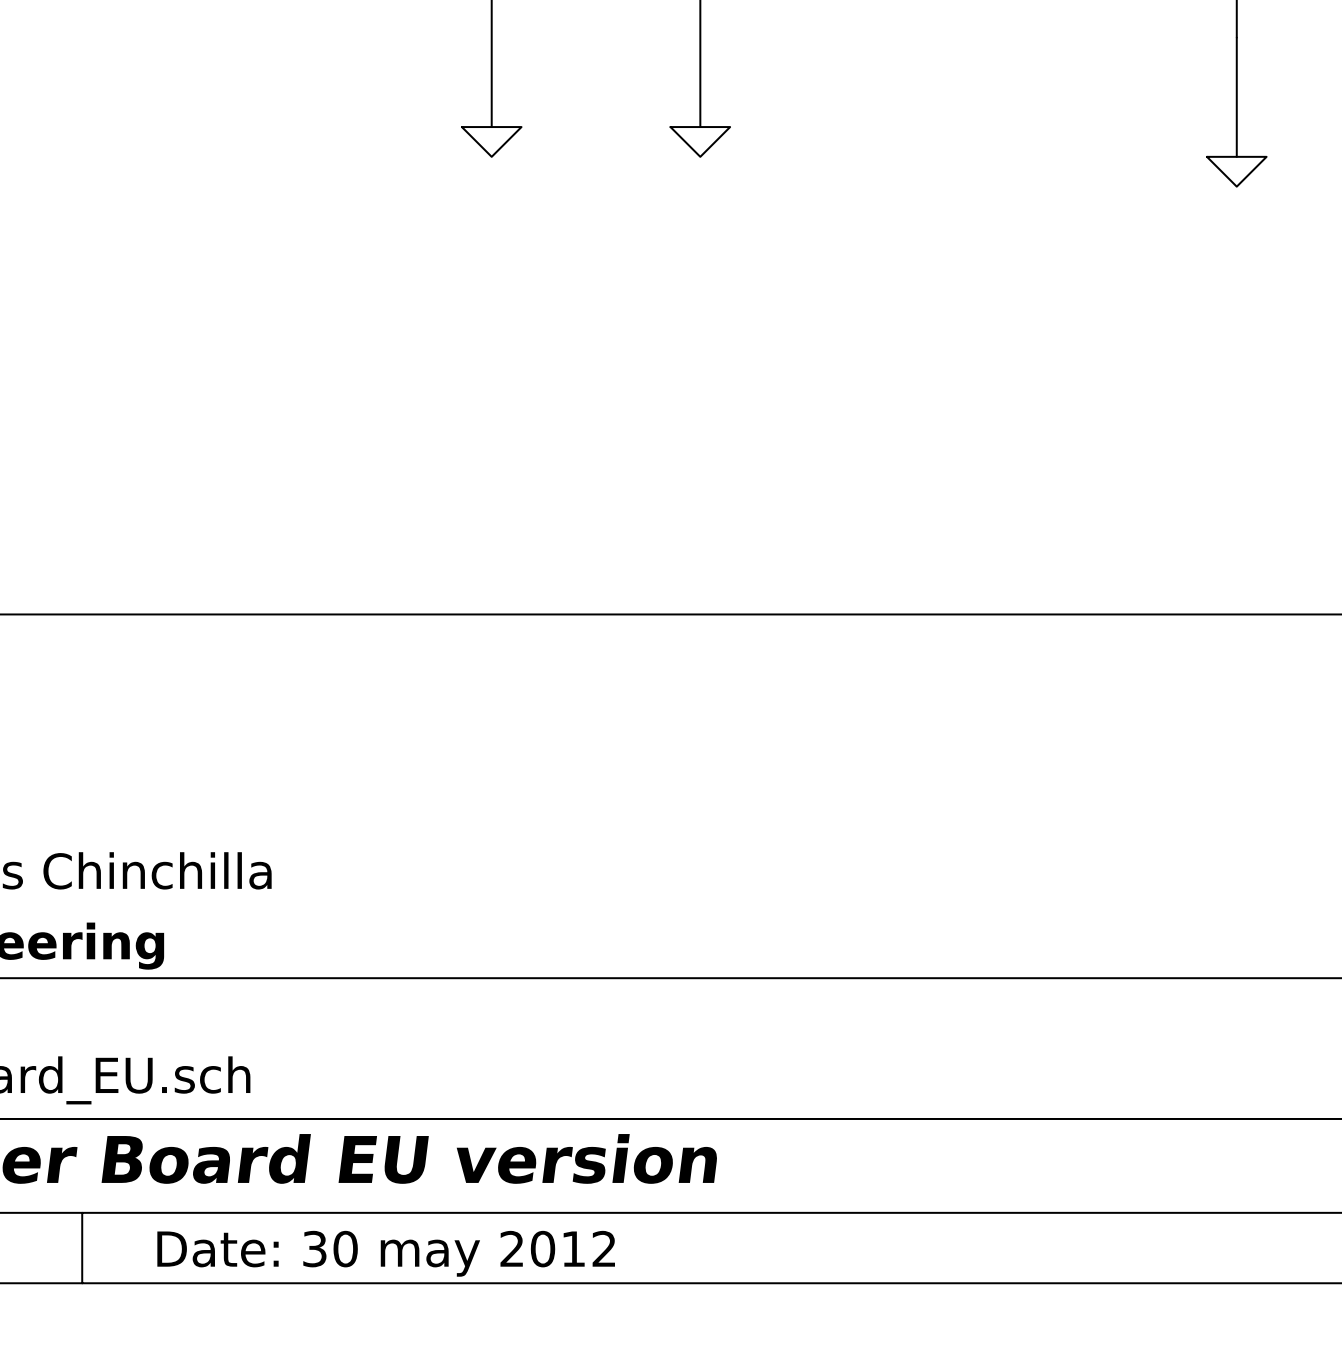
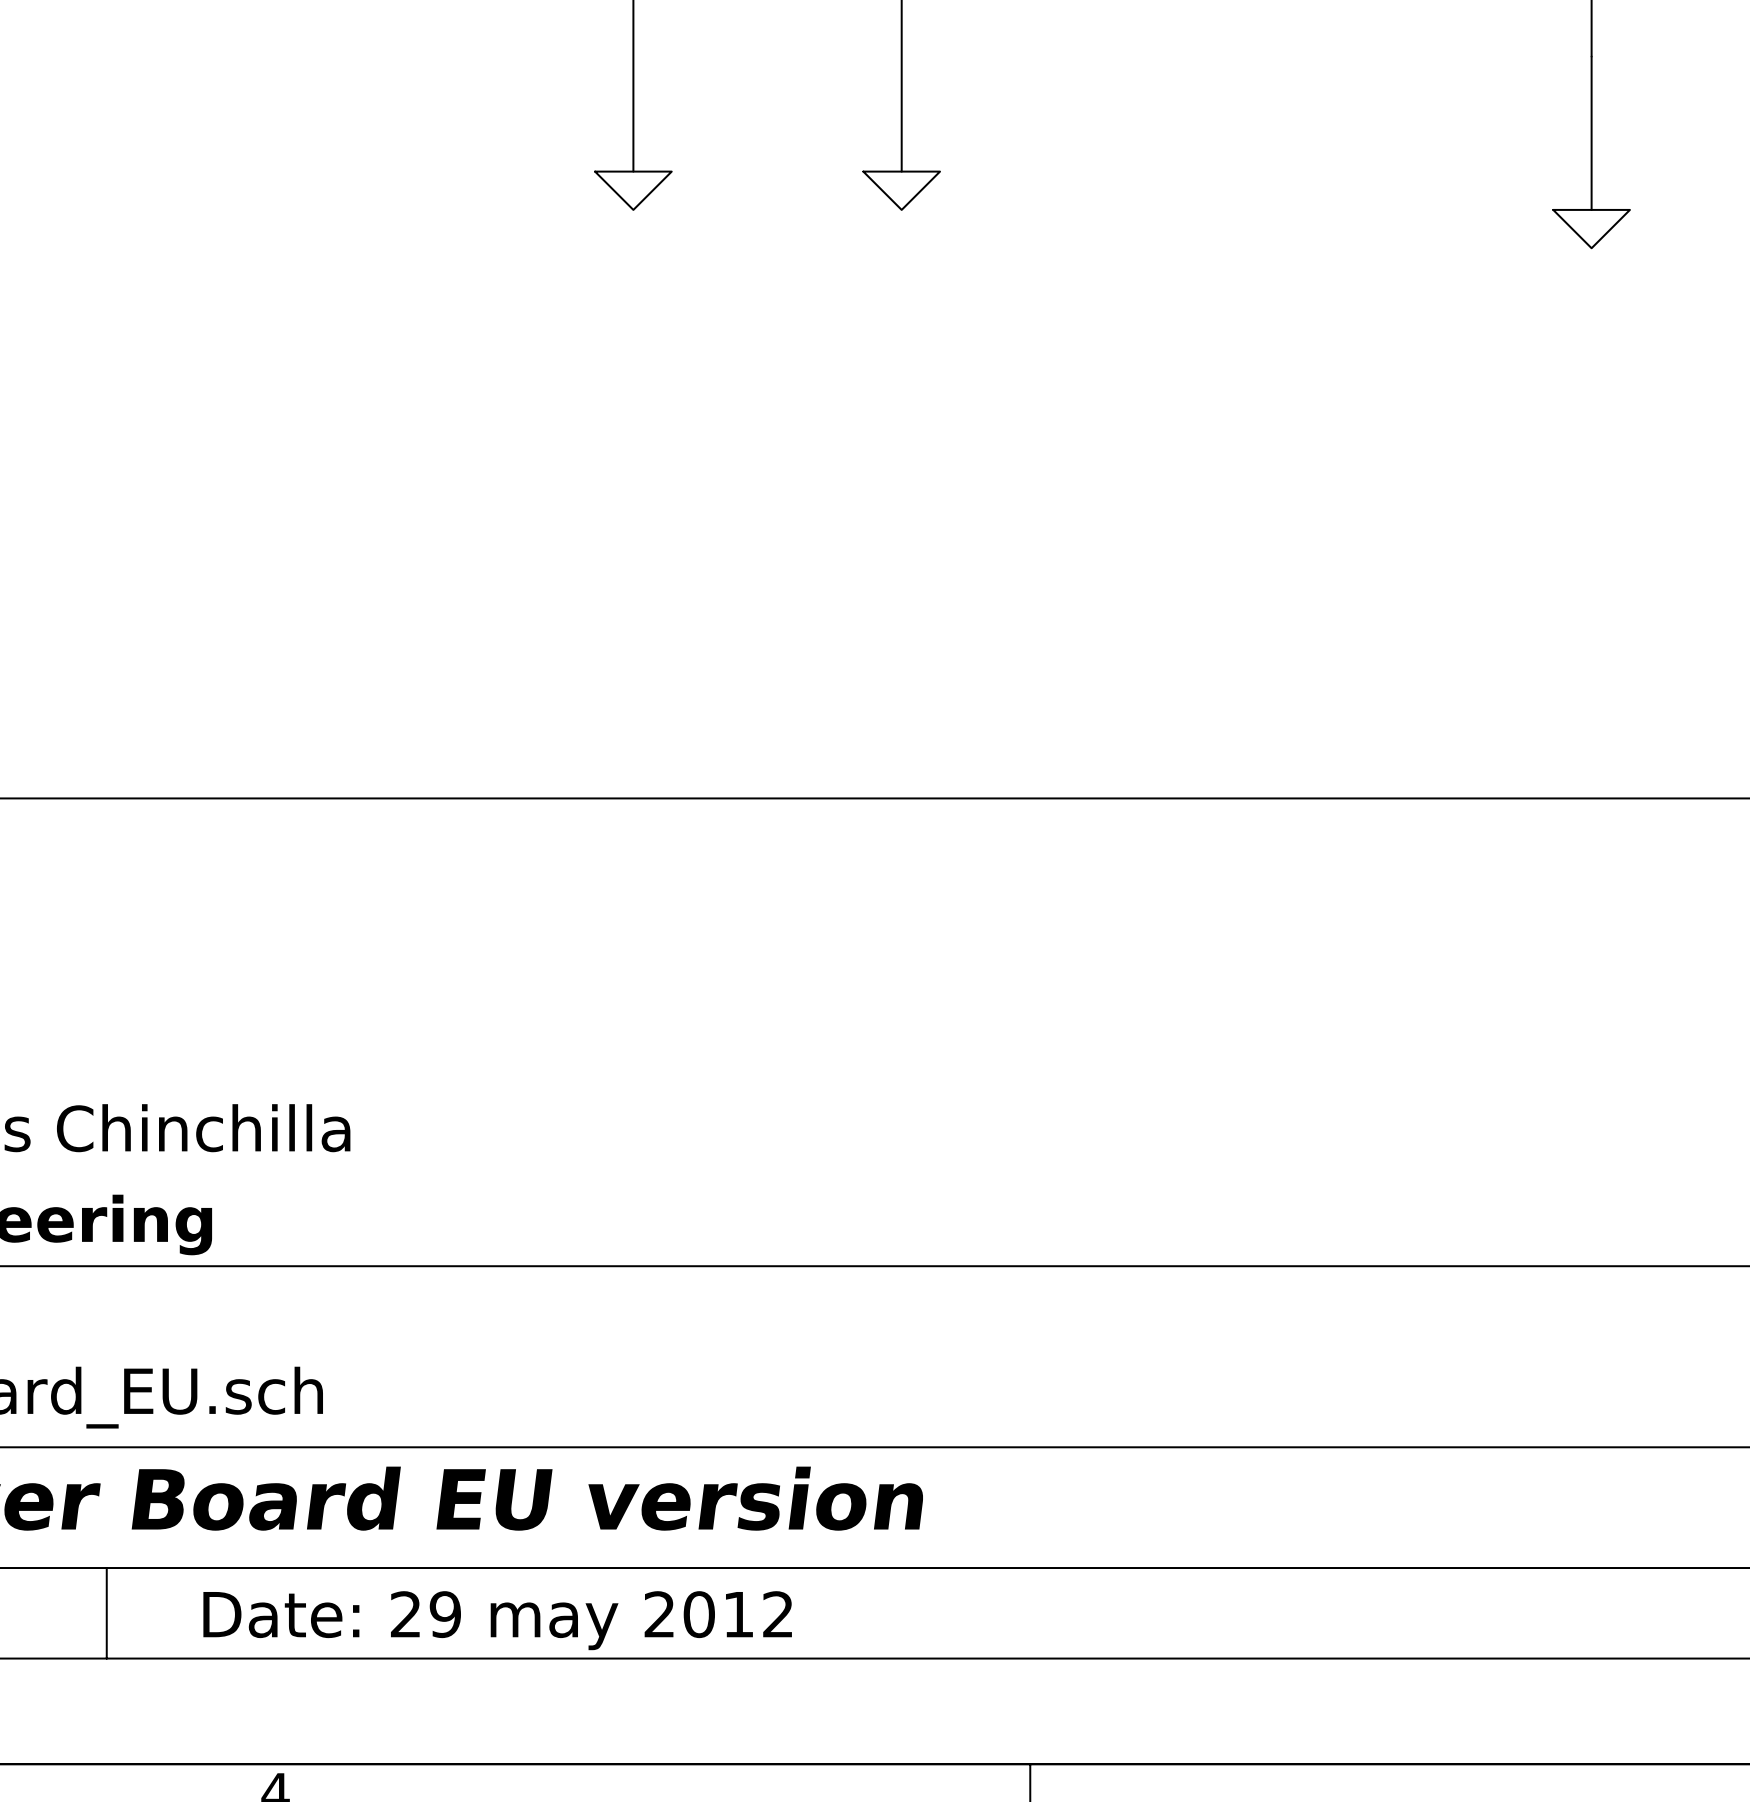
title block: Date: 30 may 2012 (386, 1253) -> Date: 29 may 2012 (497, 1620)

